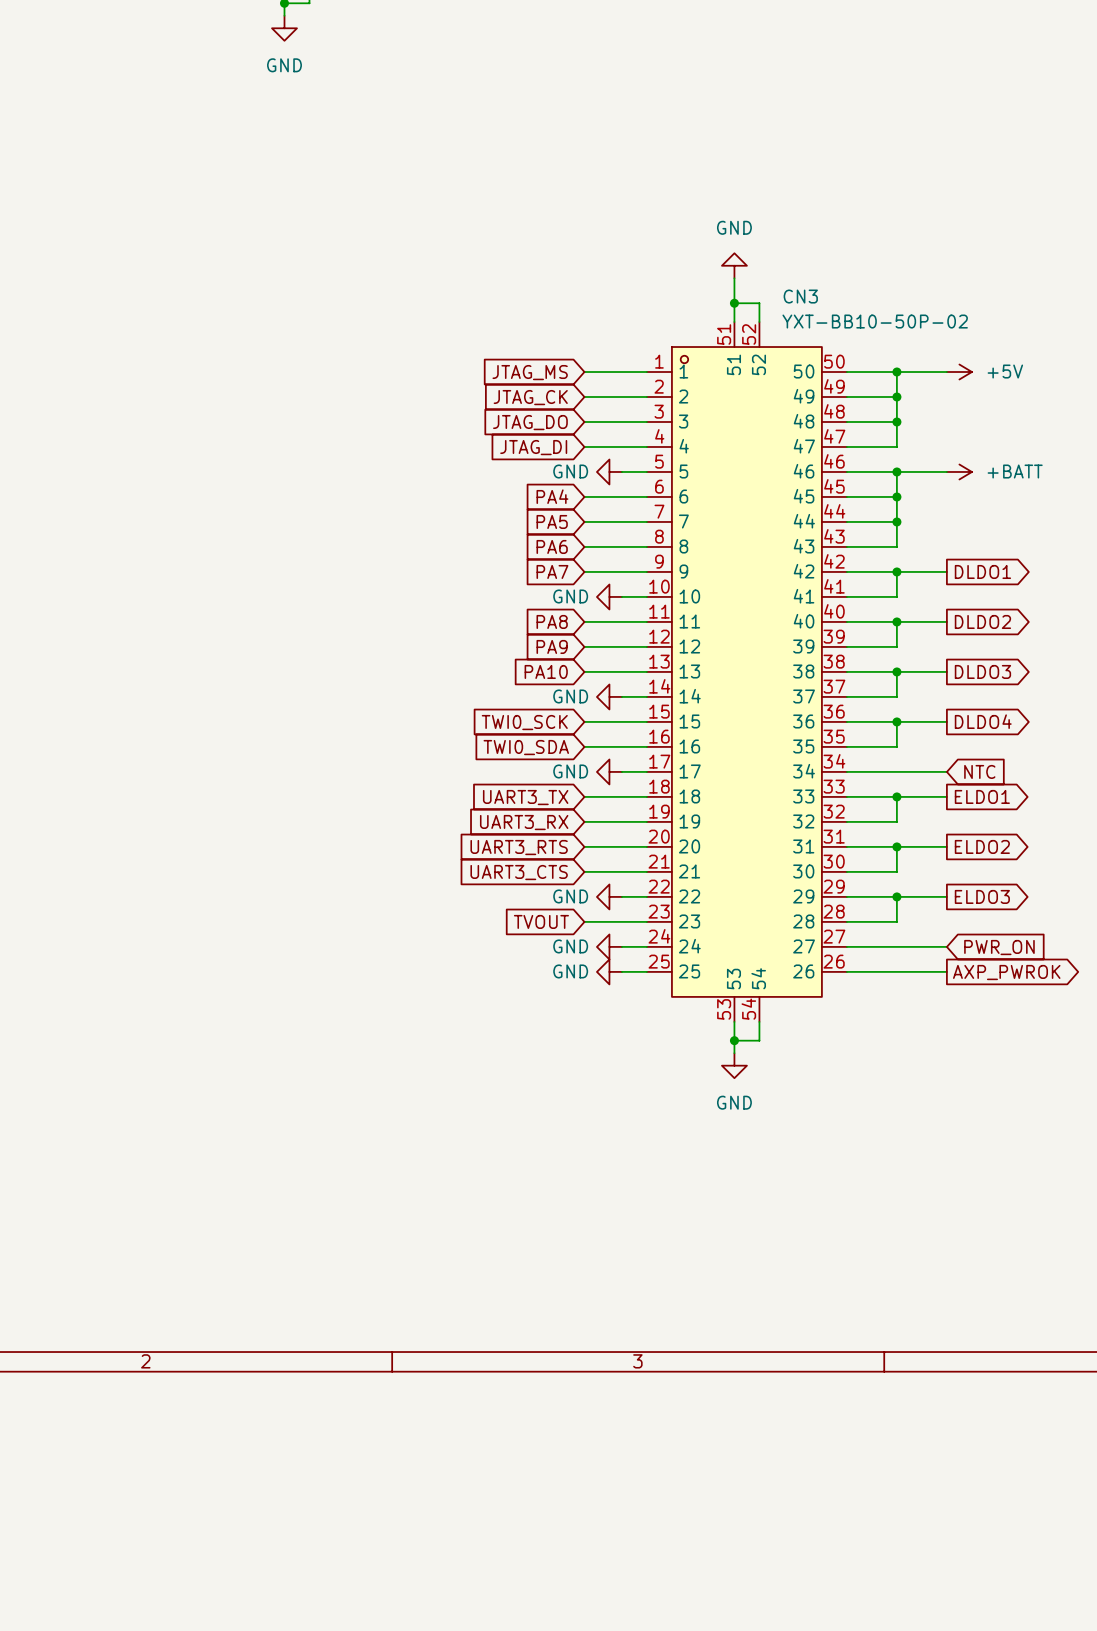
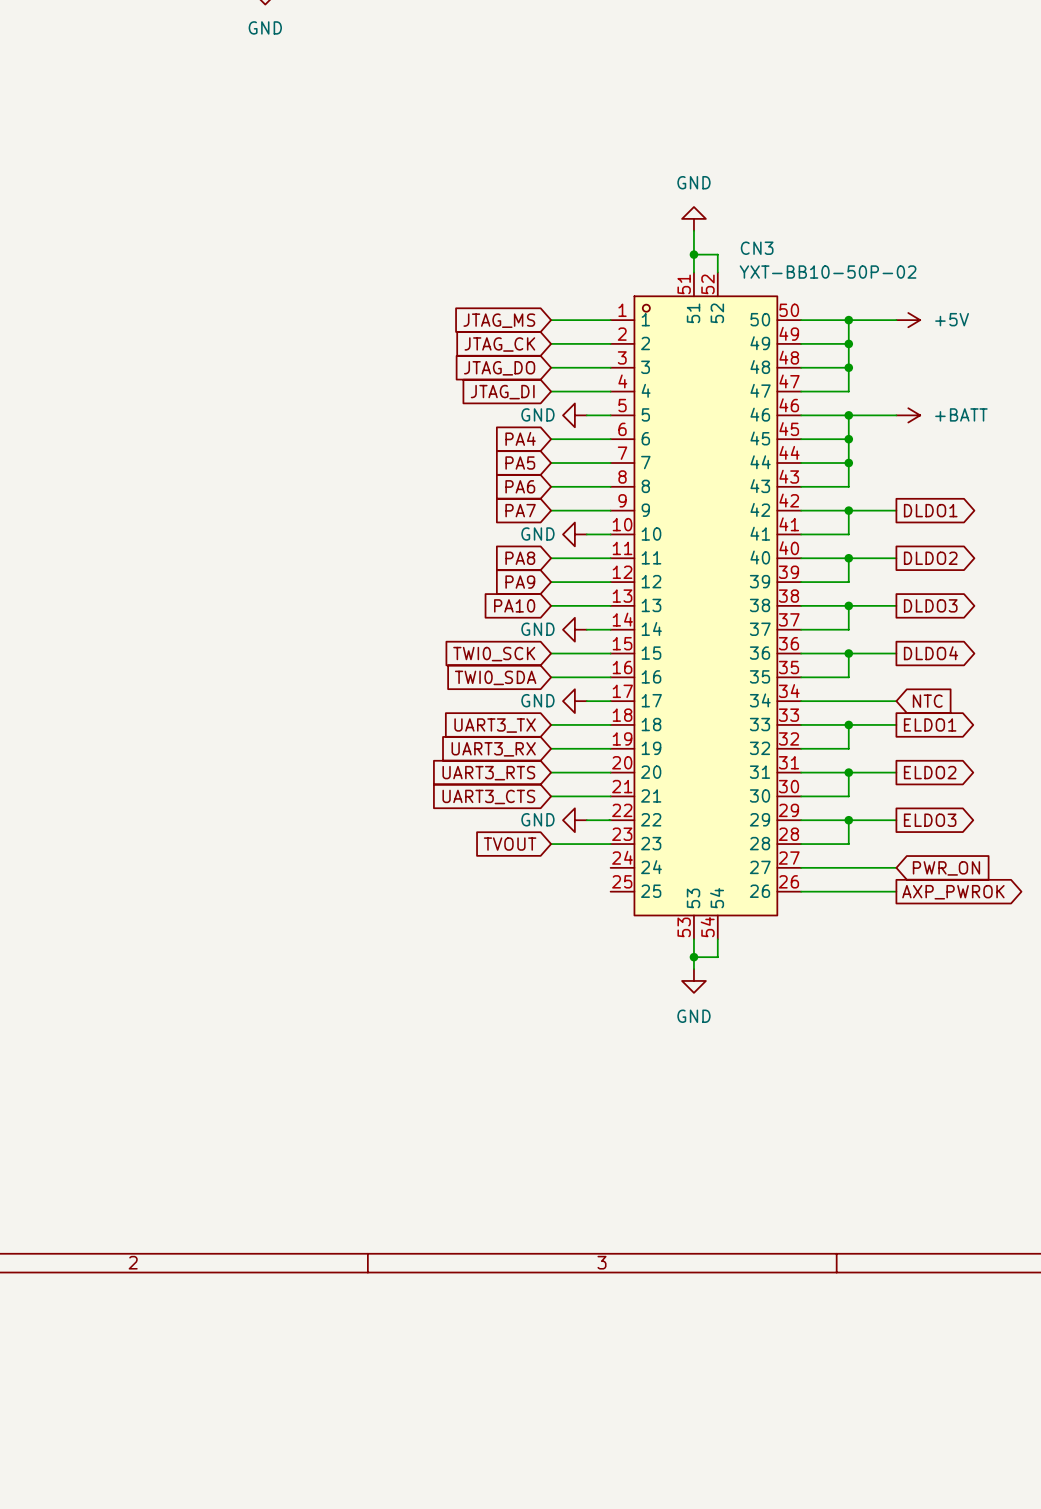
power symbol: GND (609, 946) -> none
wire: (621, 946) (646, 946) -> none
power symbol: GND (609, 971) -> none
wire: (621, 971) (646, 971) -> none

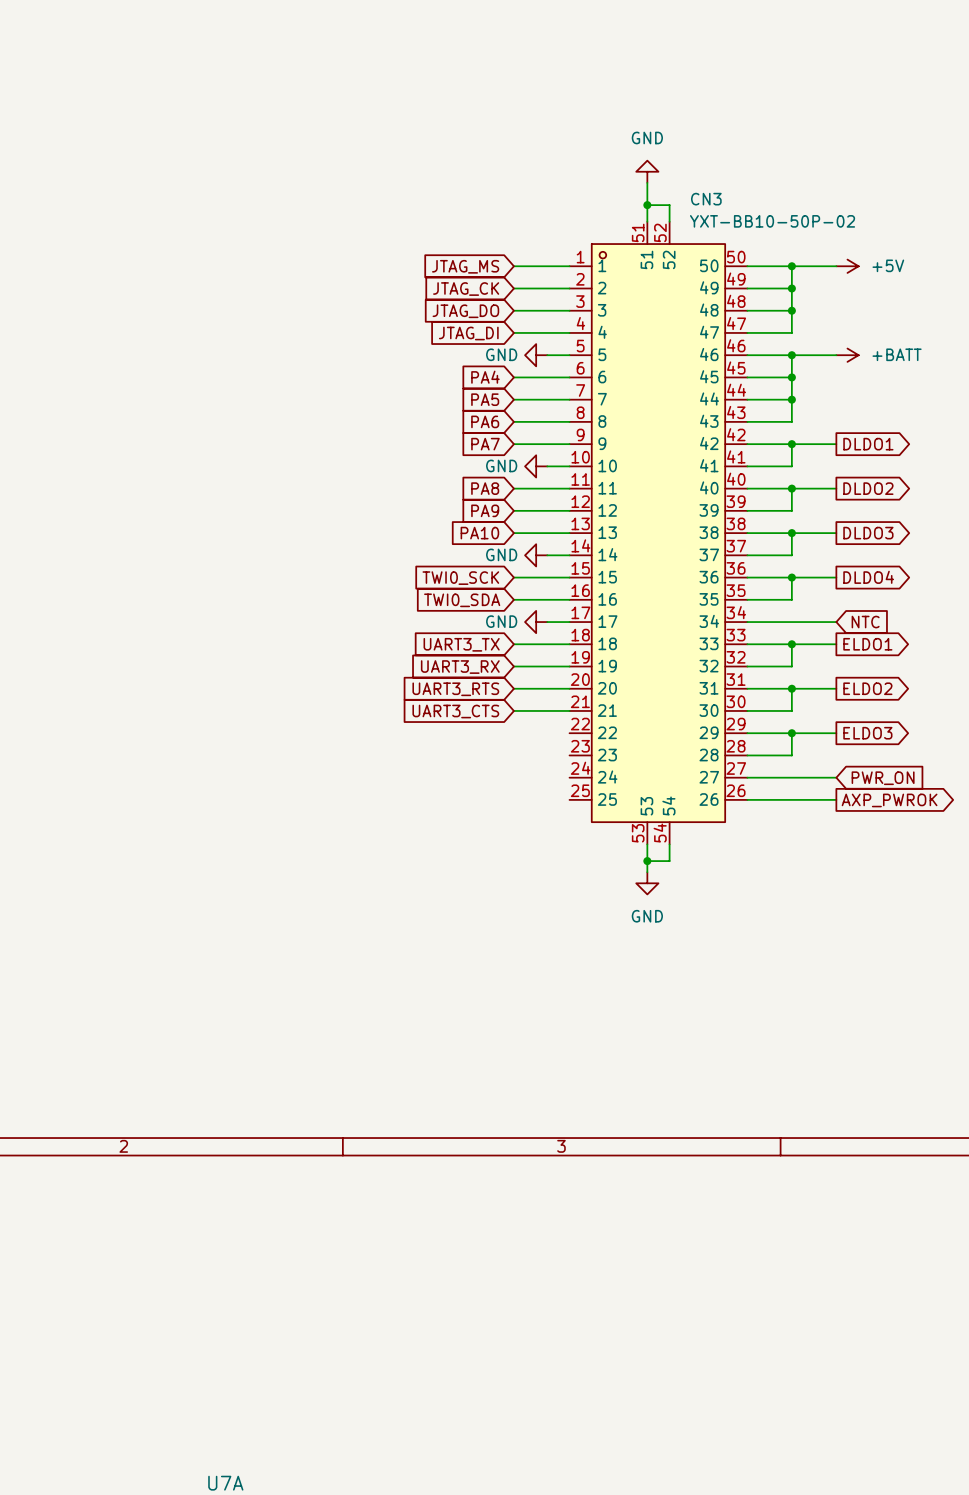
power symbol: GND (574, 820) -> none
wire: (586, 820) (610, 820) -> none
global label: TVOUT (510, 844) -> none
wire: (551, 844) (610, 844) -> none

